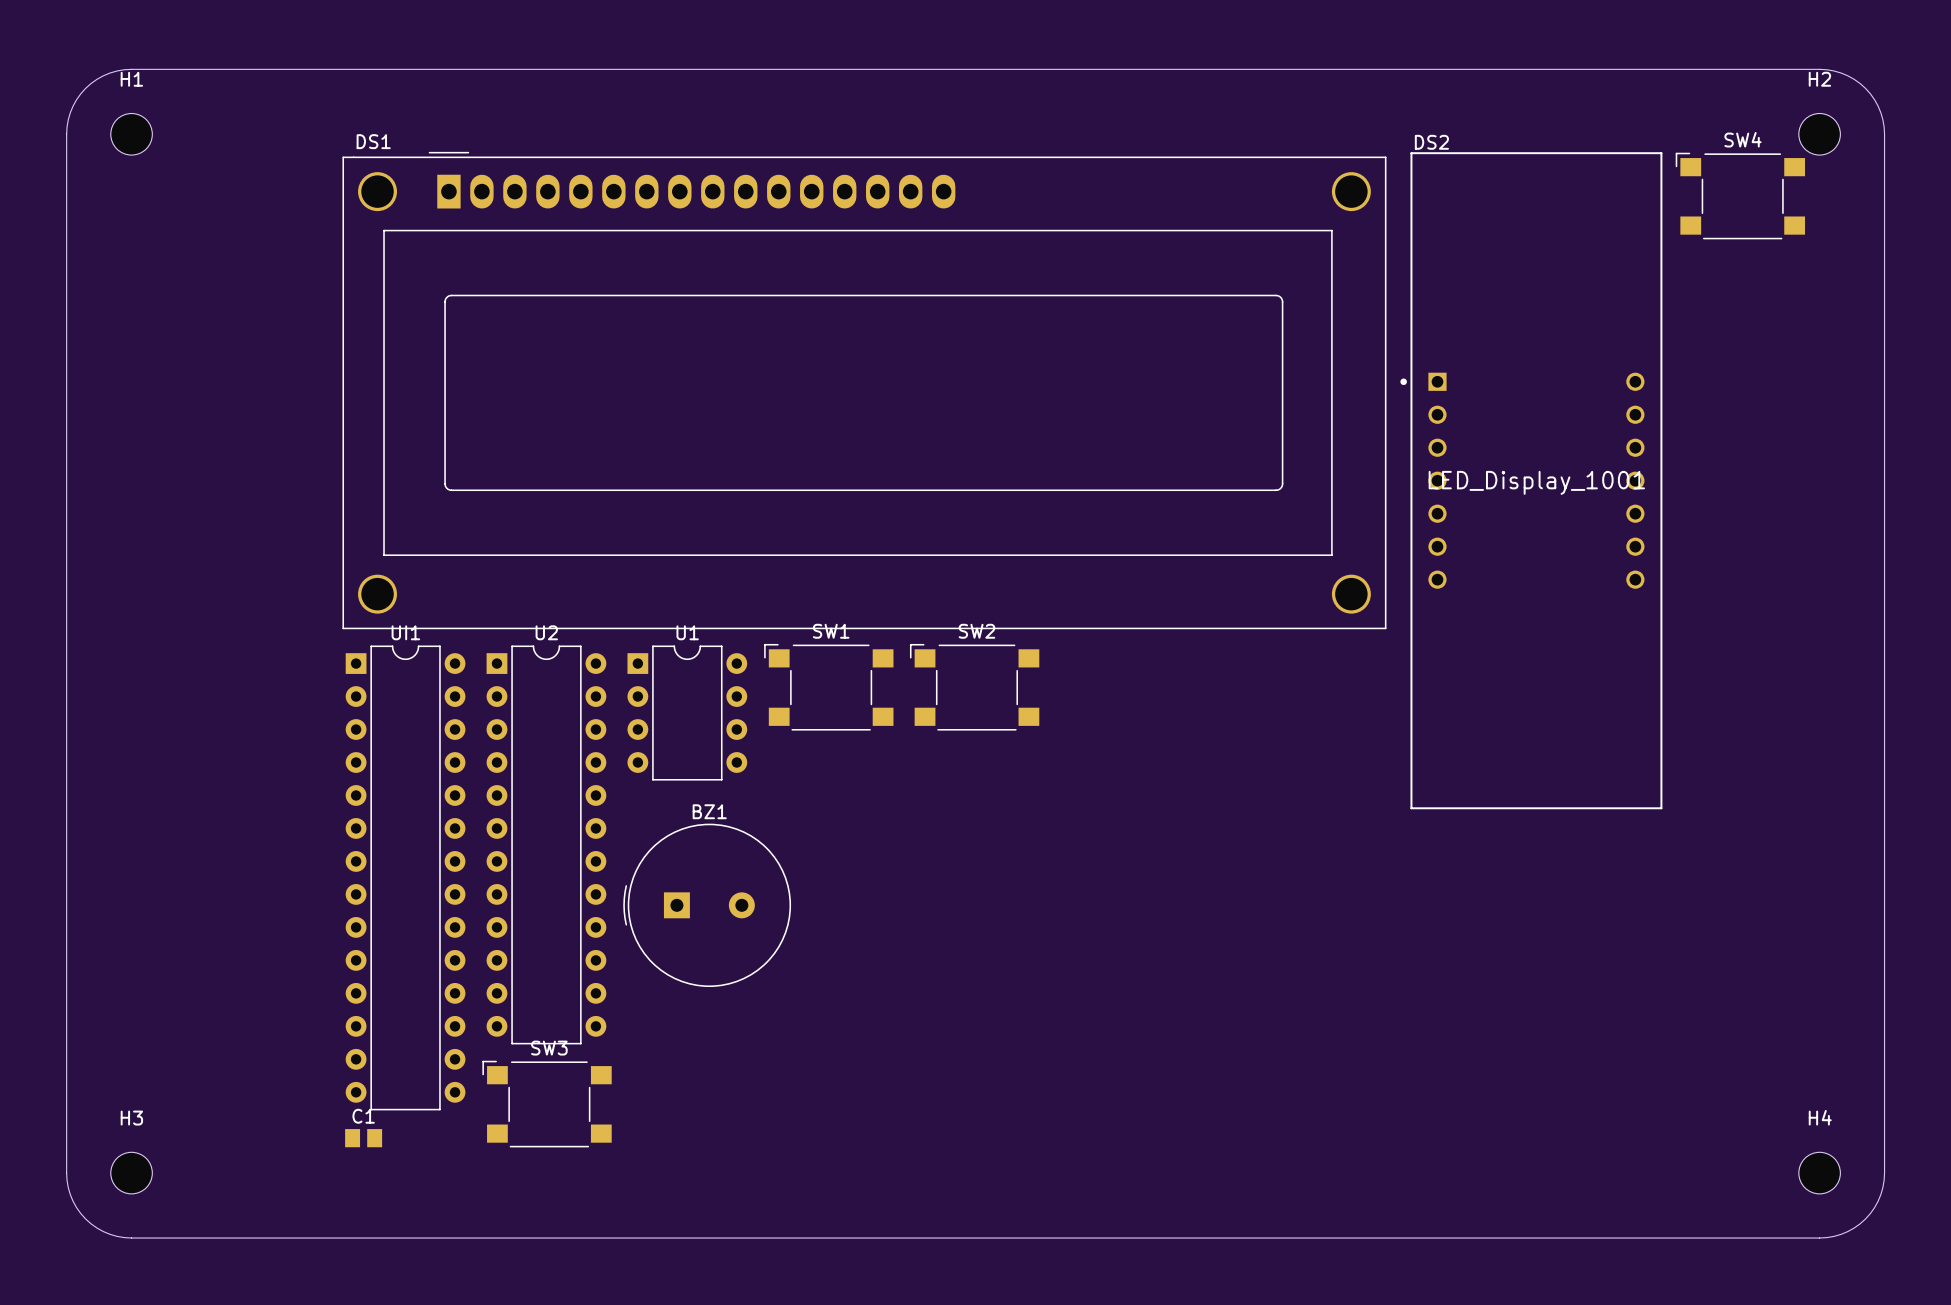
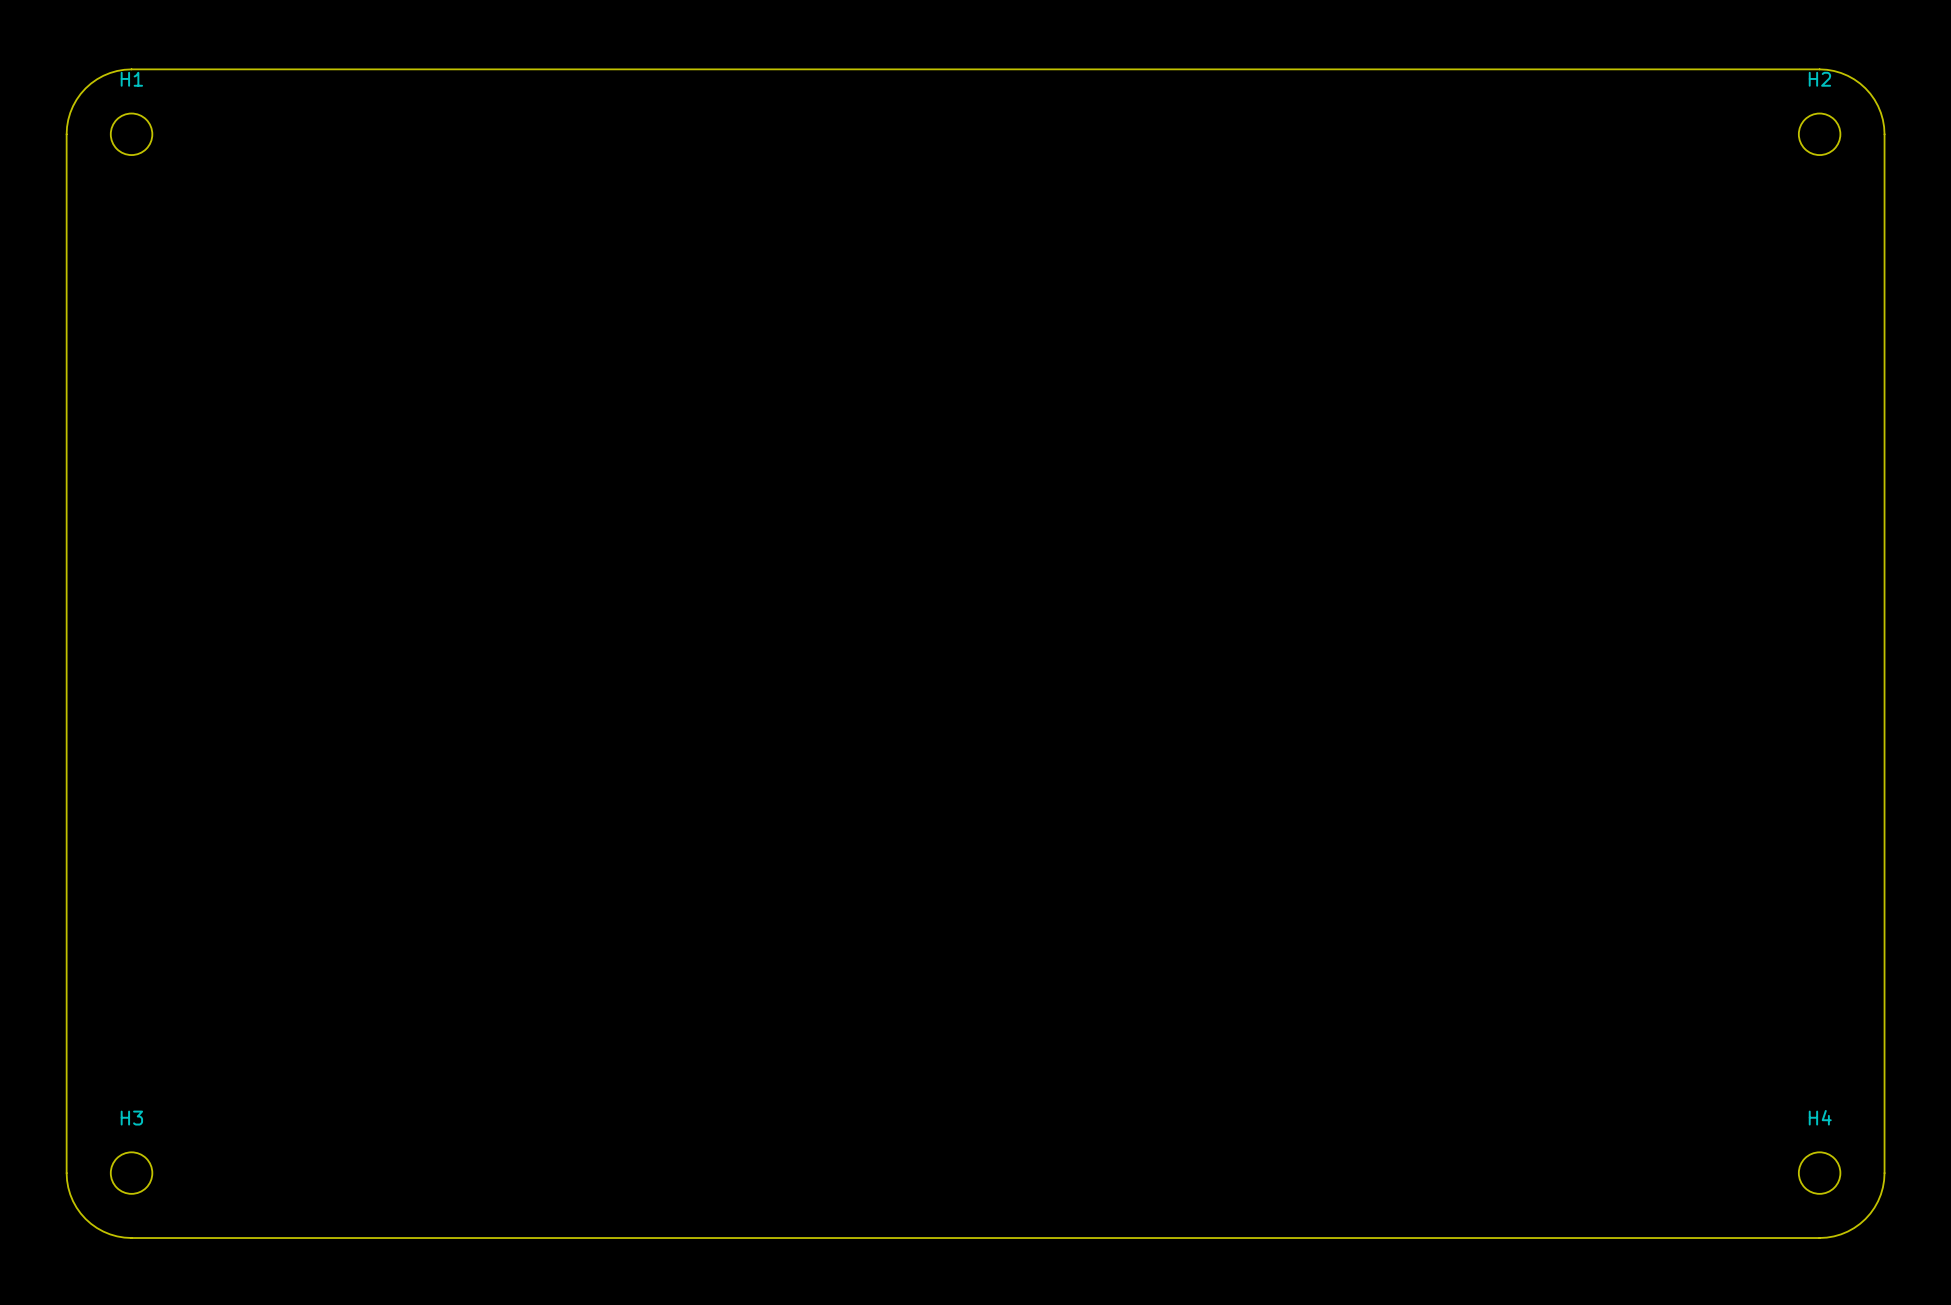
SW4: (1740, 196) -> none
DS1: (864, 390) -> none
DS2: LED_Display_1001 (1531, 480) -> none
SW1: (828, 687) -> none
SW2: (974, 687) -> none
U1: (687, 713) -> none
U2: (546, 844) -> none
UI1: (405, 877) -> none
BZ1: (707, 905) -> none
SW3: (547, 1104) -> none
C1: (363, 1138) -> none

